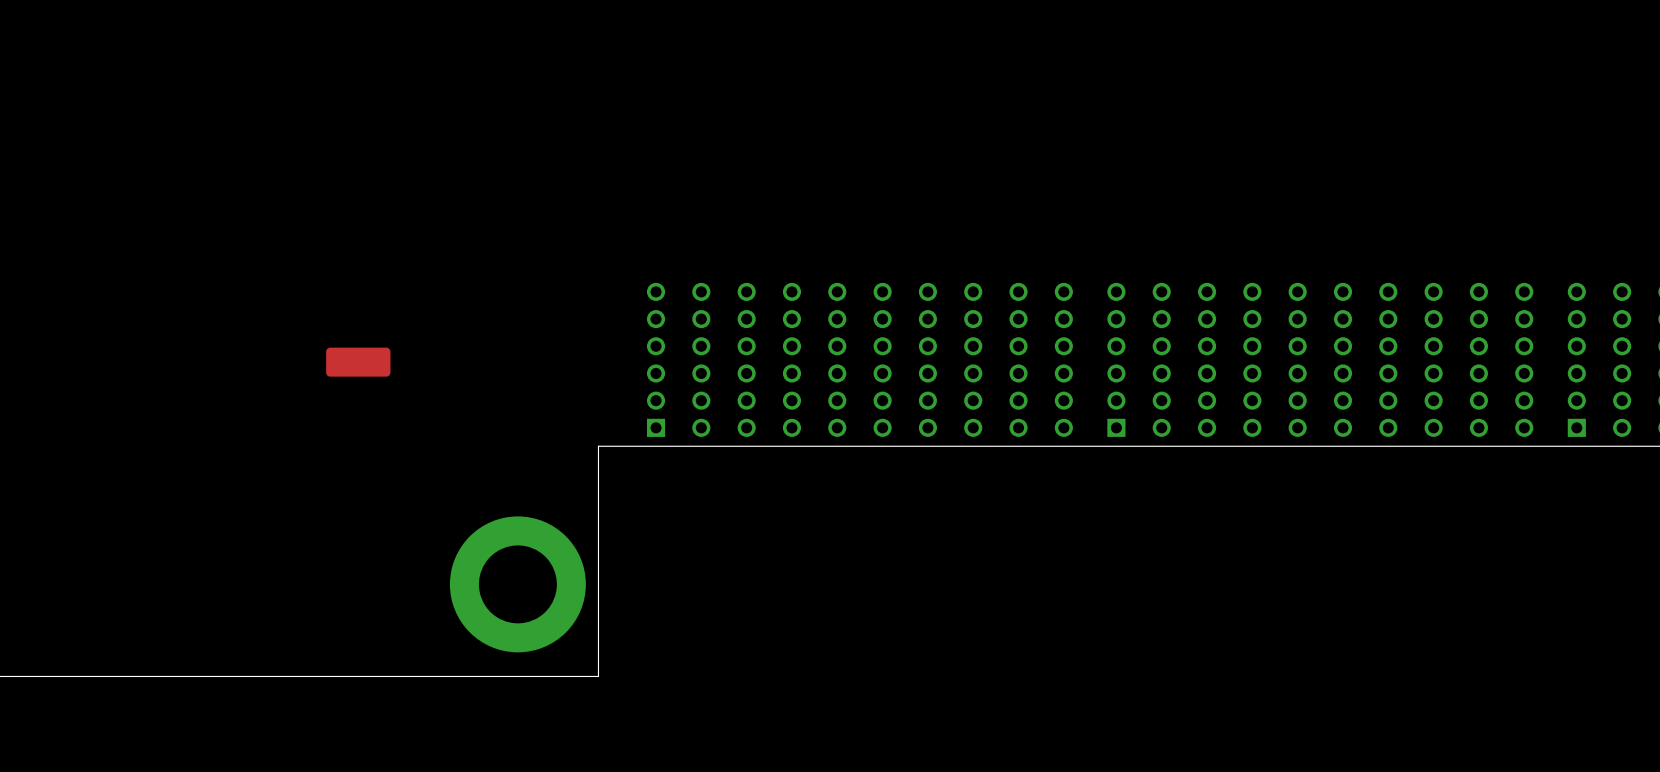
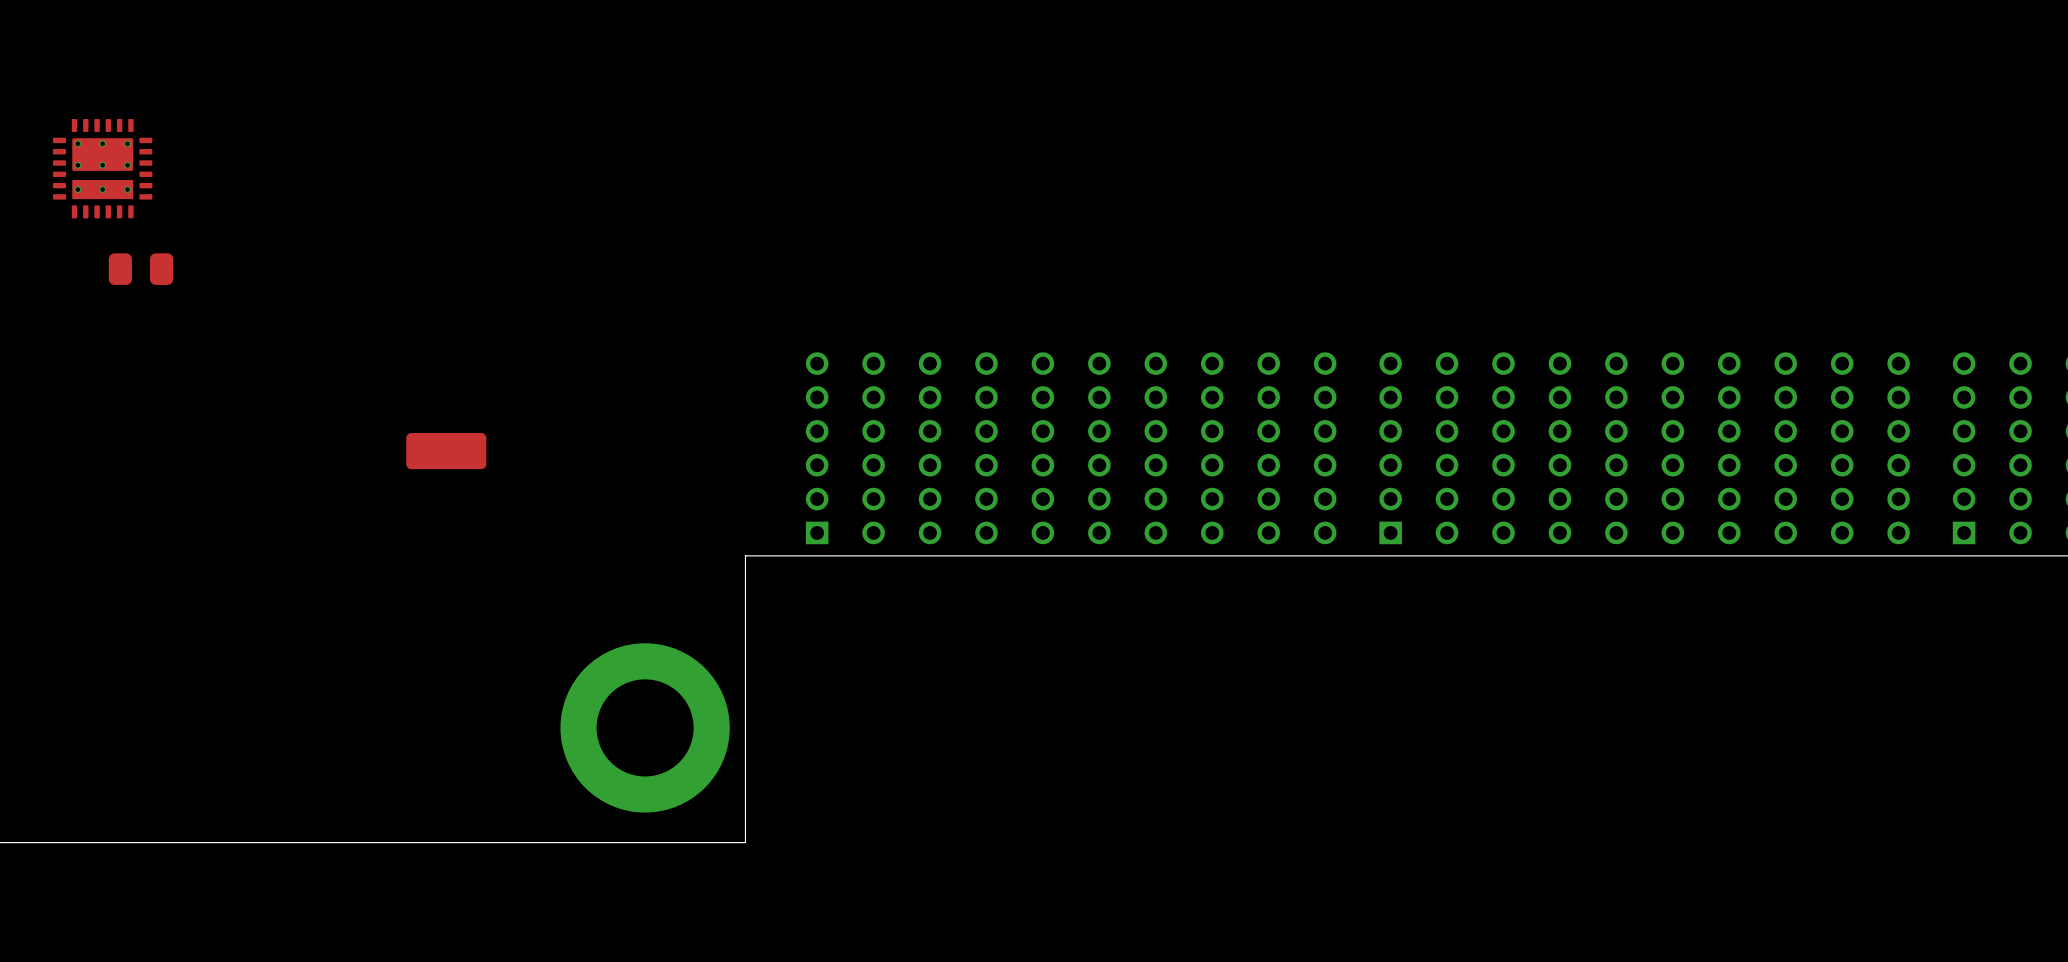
part: none -> (102, 168)
part: none -> (140, 269)

